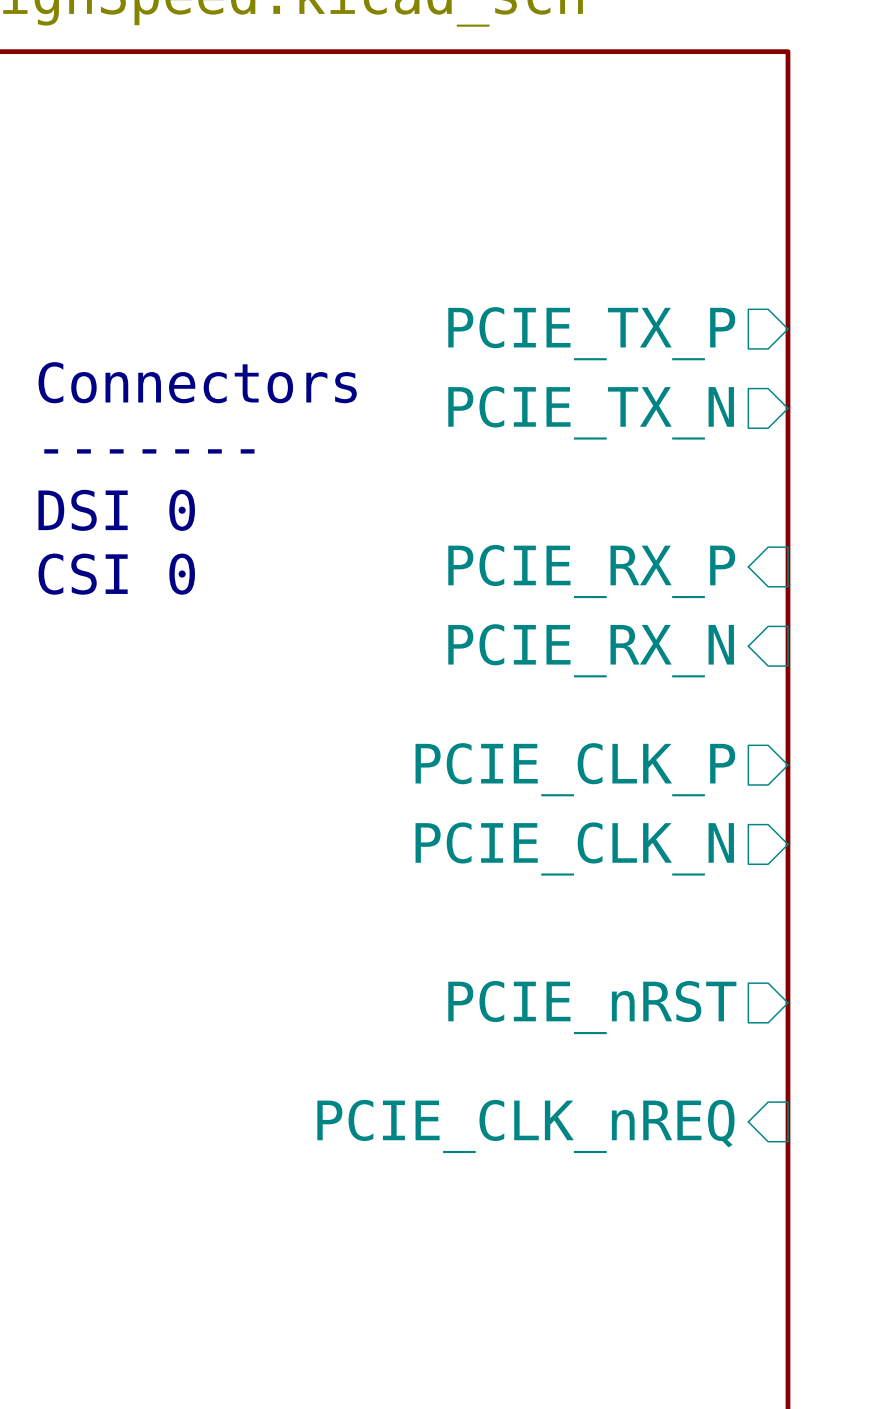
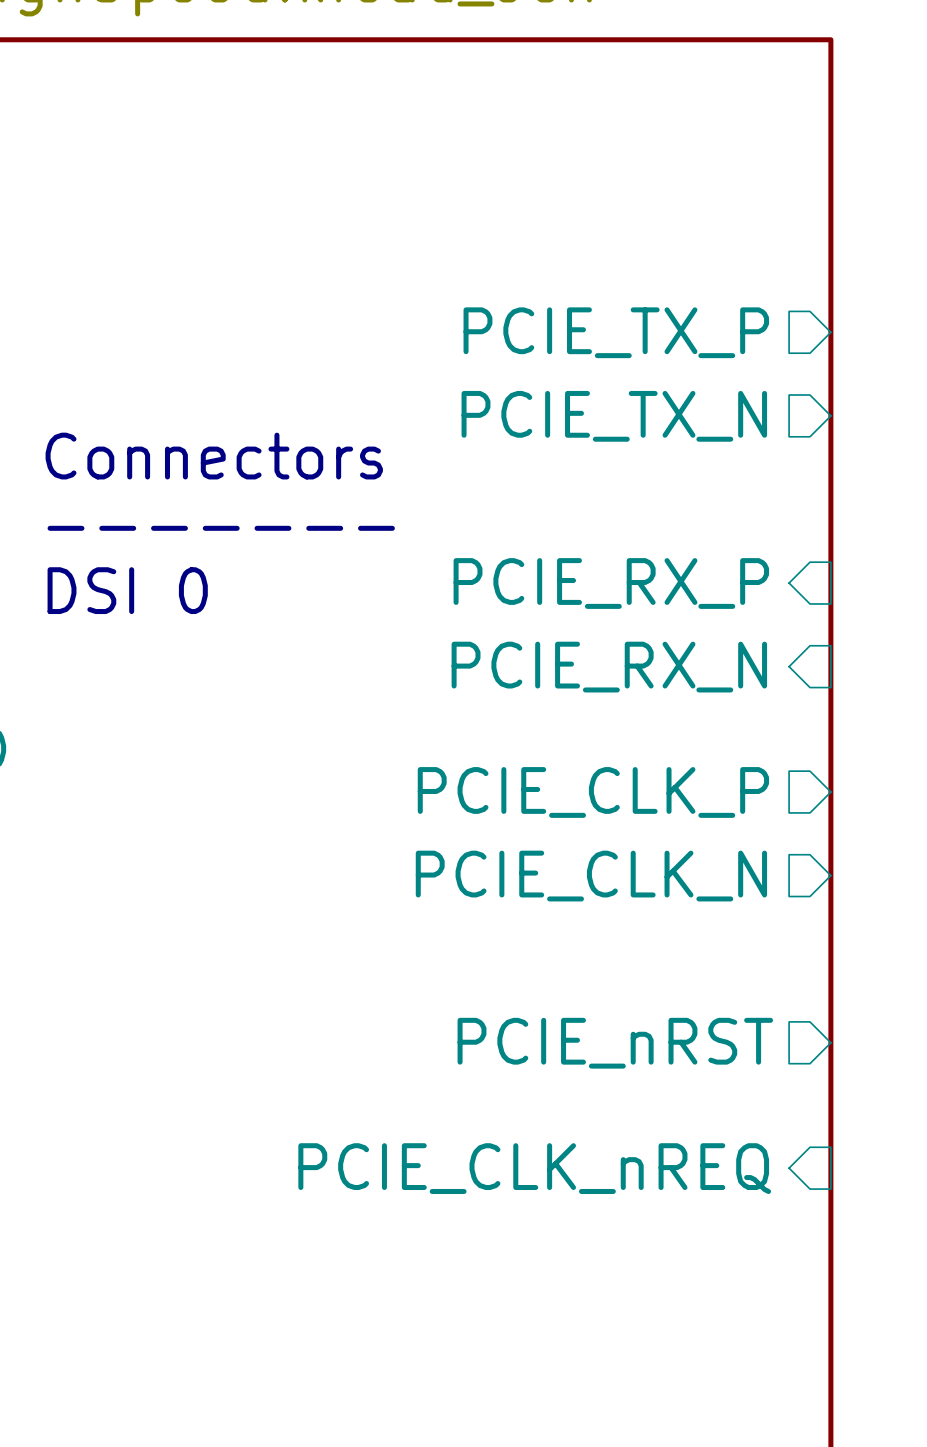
text: Connectors (197, 382) -> none
text: ------- (149, 451) -> Connectors (214, 456)
text: DSI 0 (116, 510) -> ------- (221, 528)
text: CSI 0 (116, 574) -> DSI 0 (127, 590)

